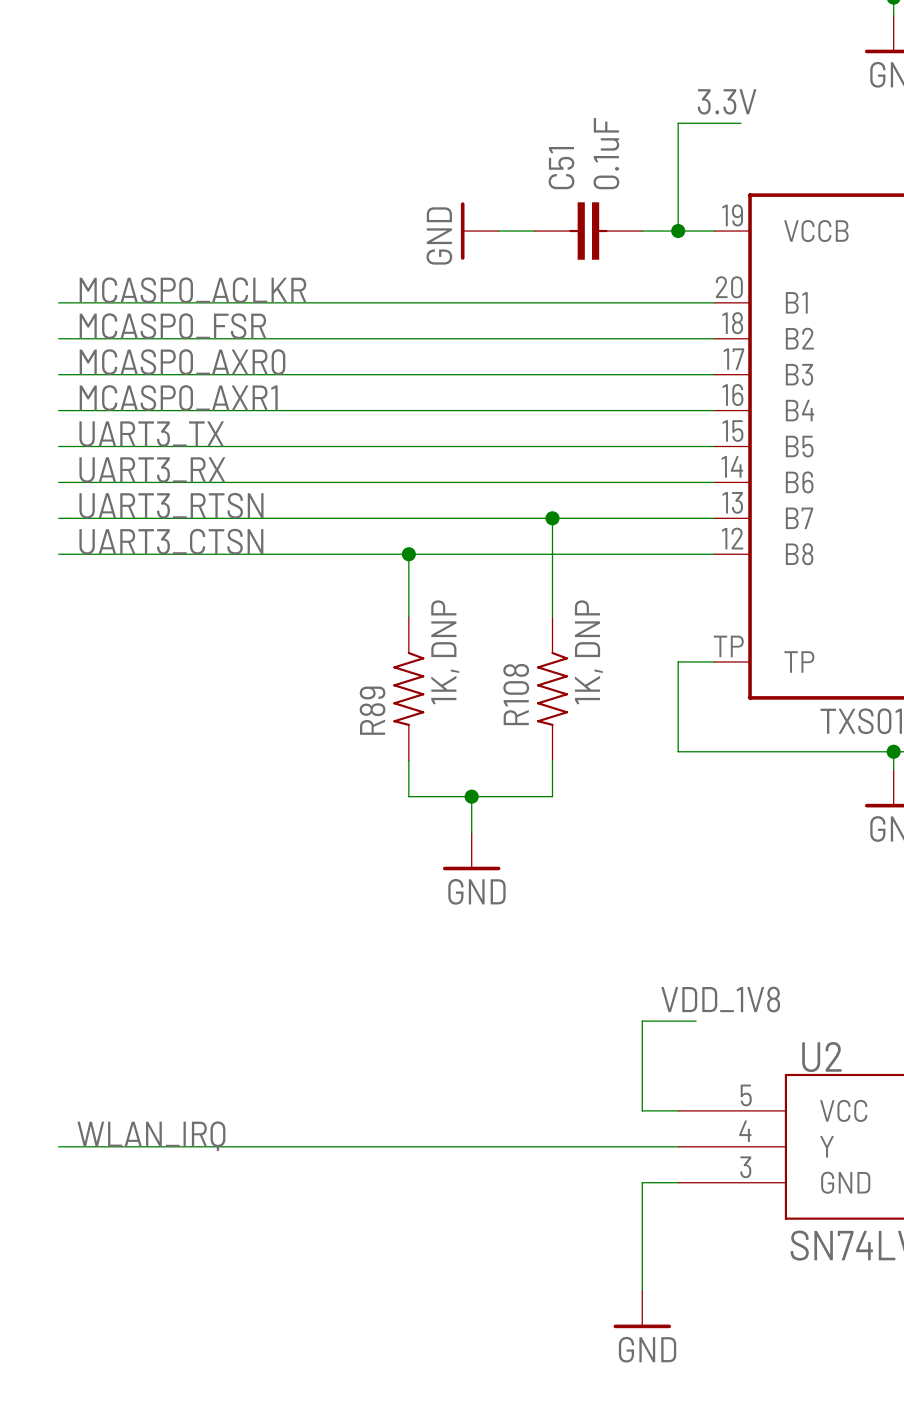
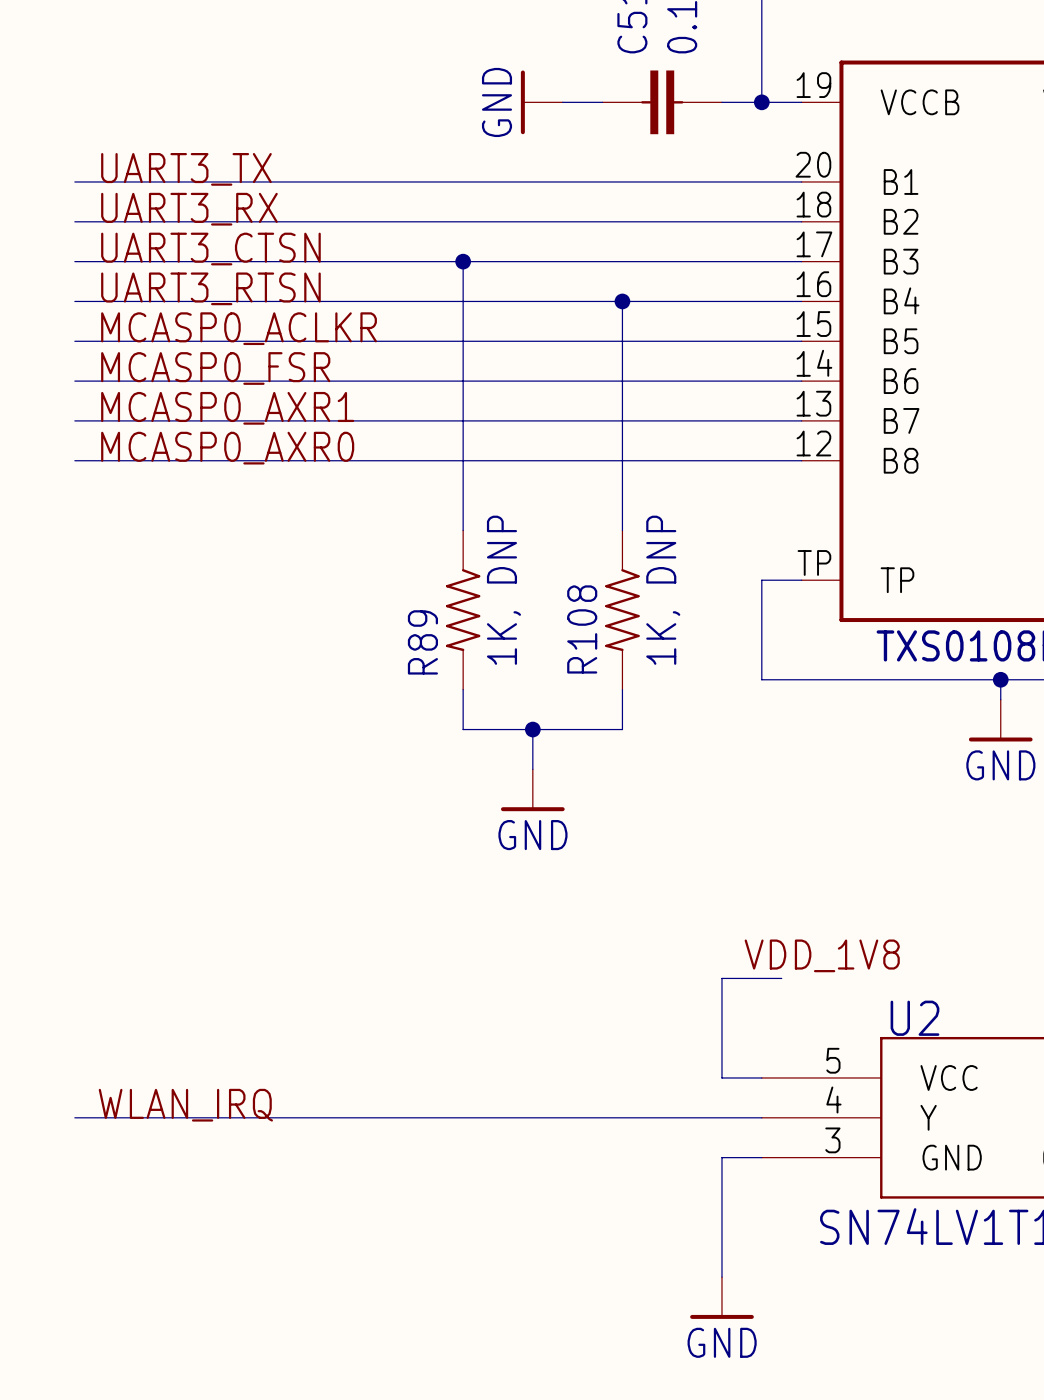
label: MCASP0_ACLKR (193, 290) -> UART3_TX (186, 169)
label: MCASP0_FSR (173, 326) -> UART3_RX (189, 209)
label: MCASP0_AXR0 (182, 362) -> UART3_CTSN (210, 249)
wire: none -> (463, 261) (463, 460)
junction: none -> (463, 261)
label: MCASP0_AXR1 (178, 398) -> UART3_RTSN (210, 288)
wire: none -> (622, 301) (622, 420)
junction: none -> (622, 301)
label: UART3_TX (151, 434) -> MCASP0_ACLKR (239, 328)
label: UART3_RX (152, 469) -> MCASP0_FSR (215, 368)
label: UART3_RTSN (171, 505) -> MCASP0_AXR1 (227, 408)
junction: (552, 518) -> none
label: UART3_CTSN (171, 541) -> MCASP0_AXR0 (227, 448)
junction: (408, 554) -> none

